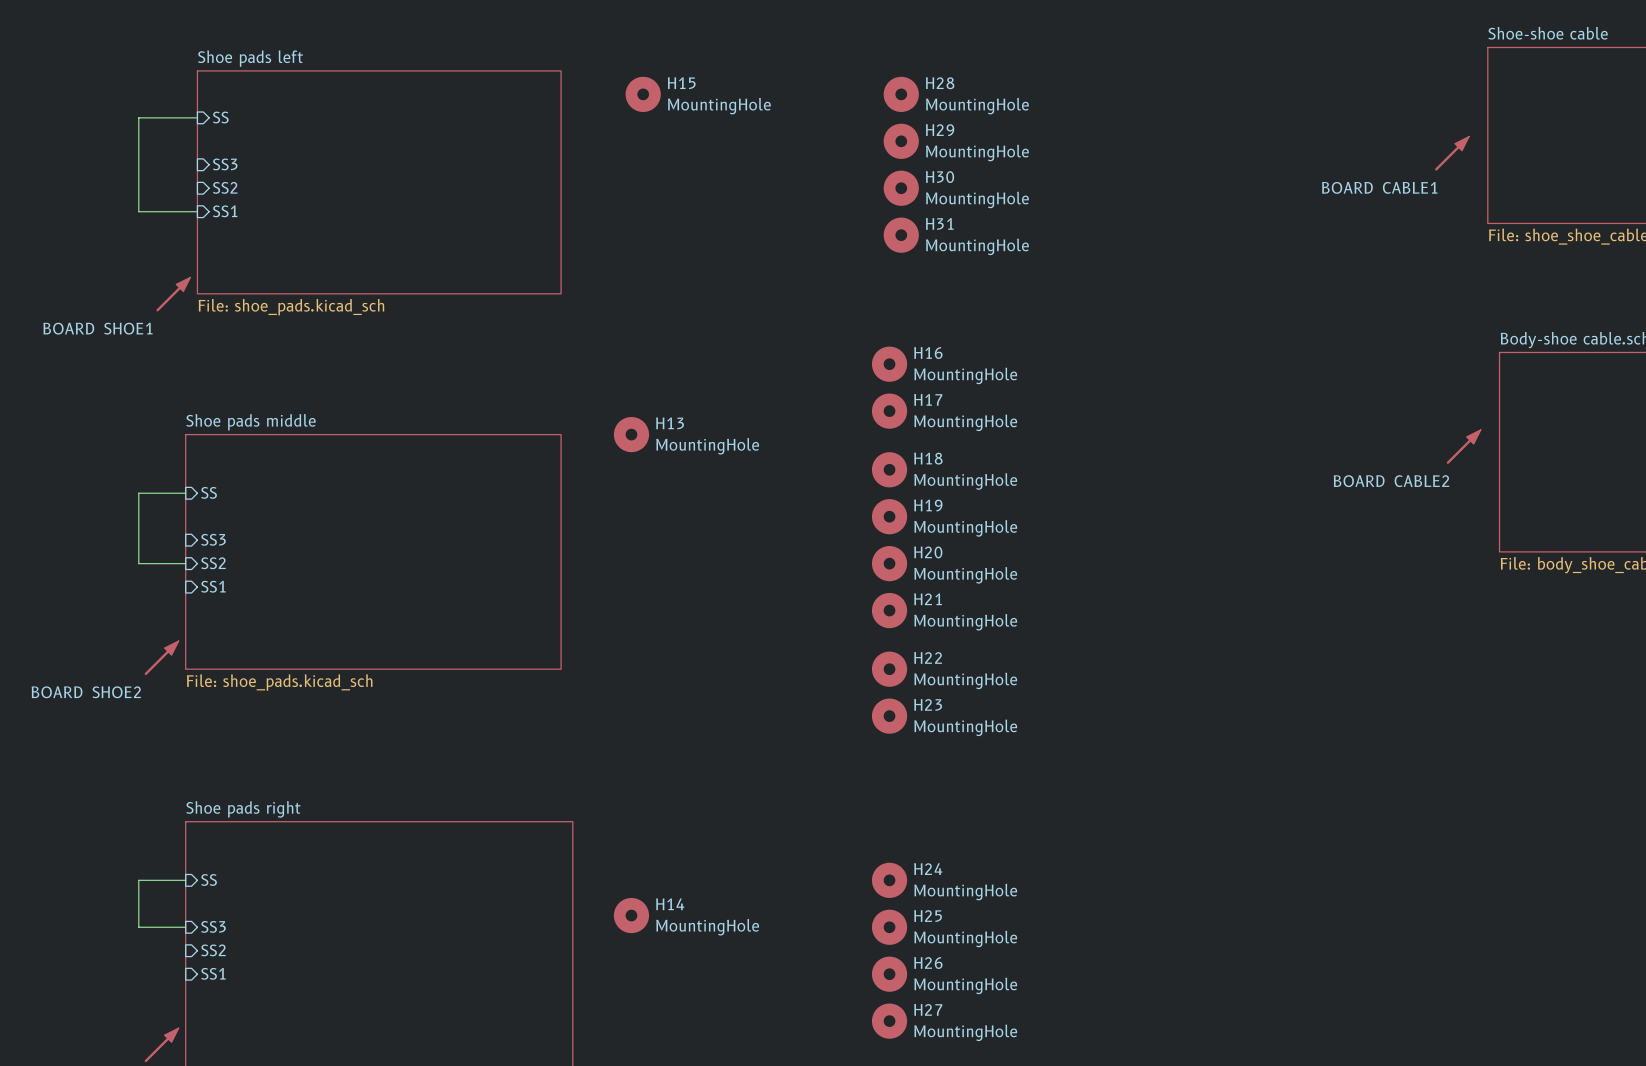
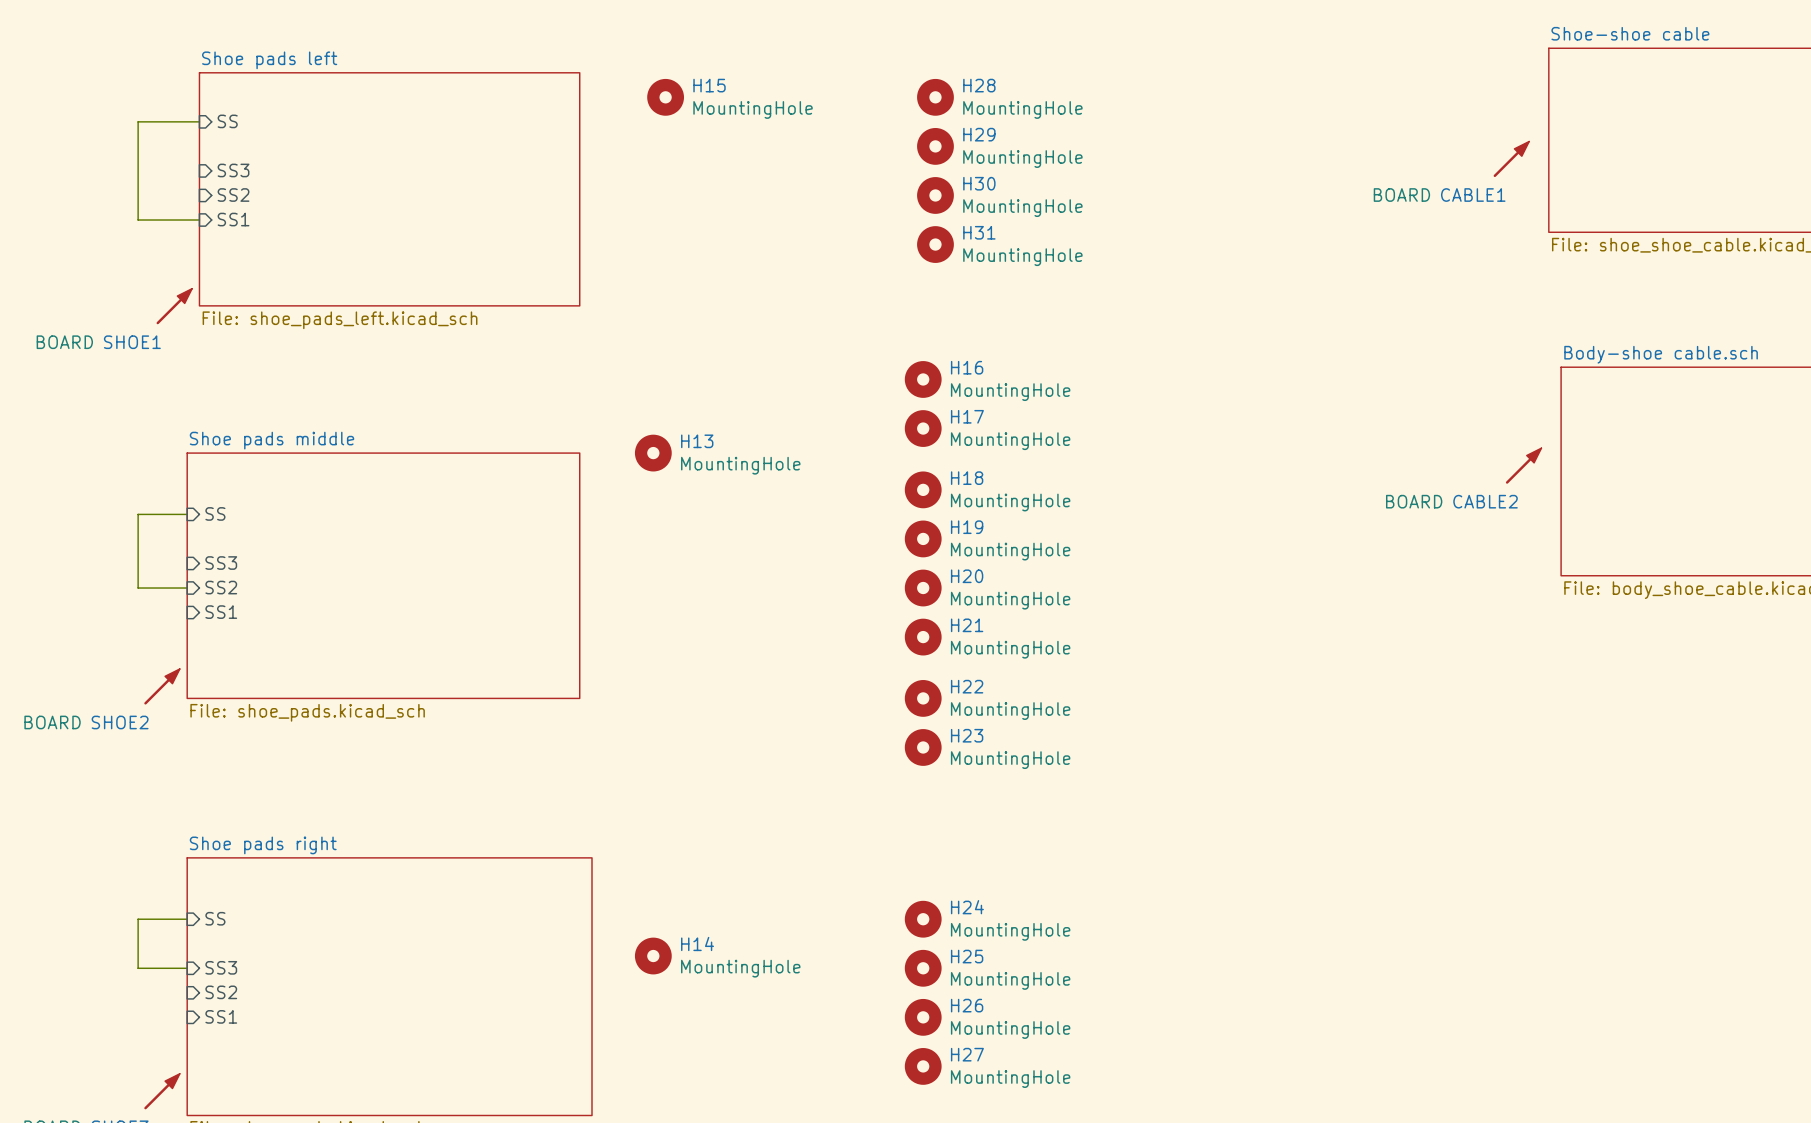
sheet Shoe pads left value: File: shoe_pads.kicad_sch (291, 307) -> File: shoe_pads_left.kicad_sch (340, 320)

